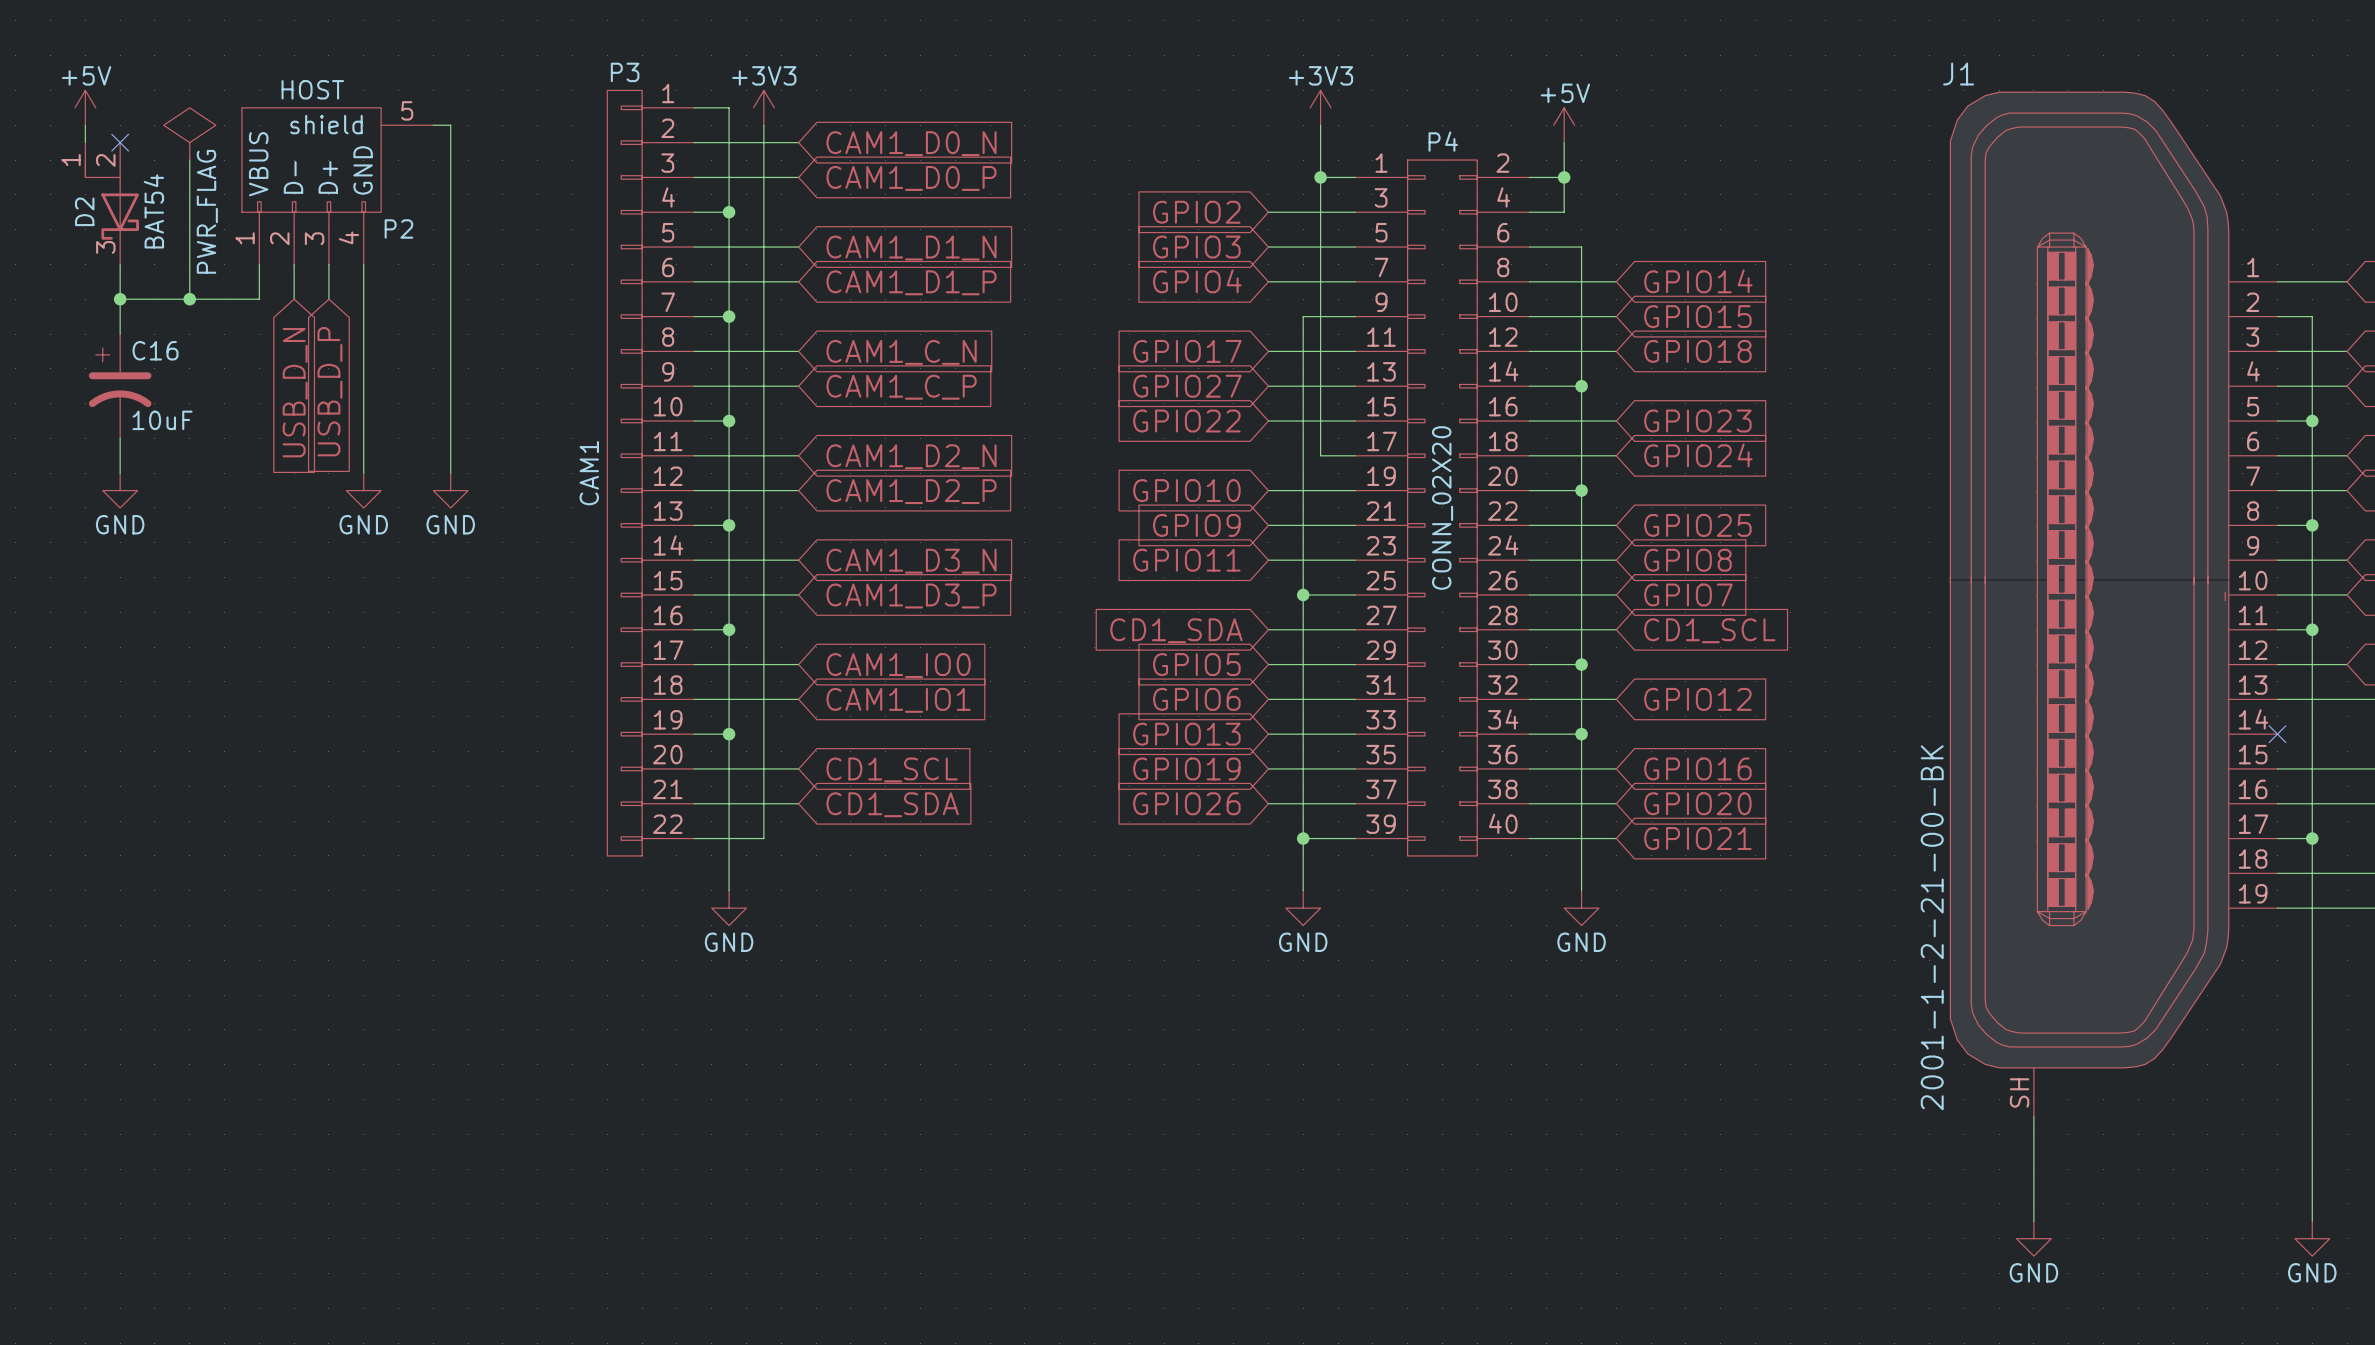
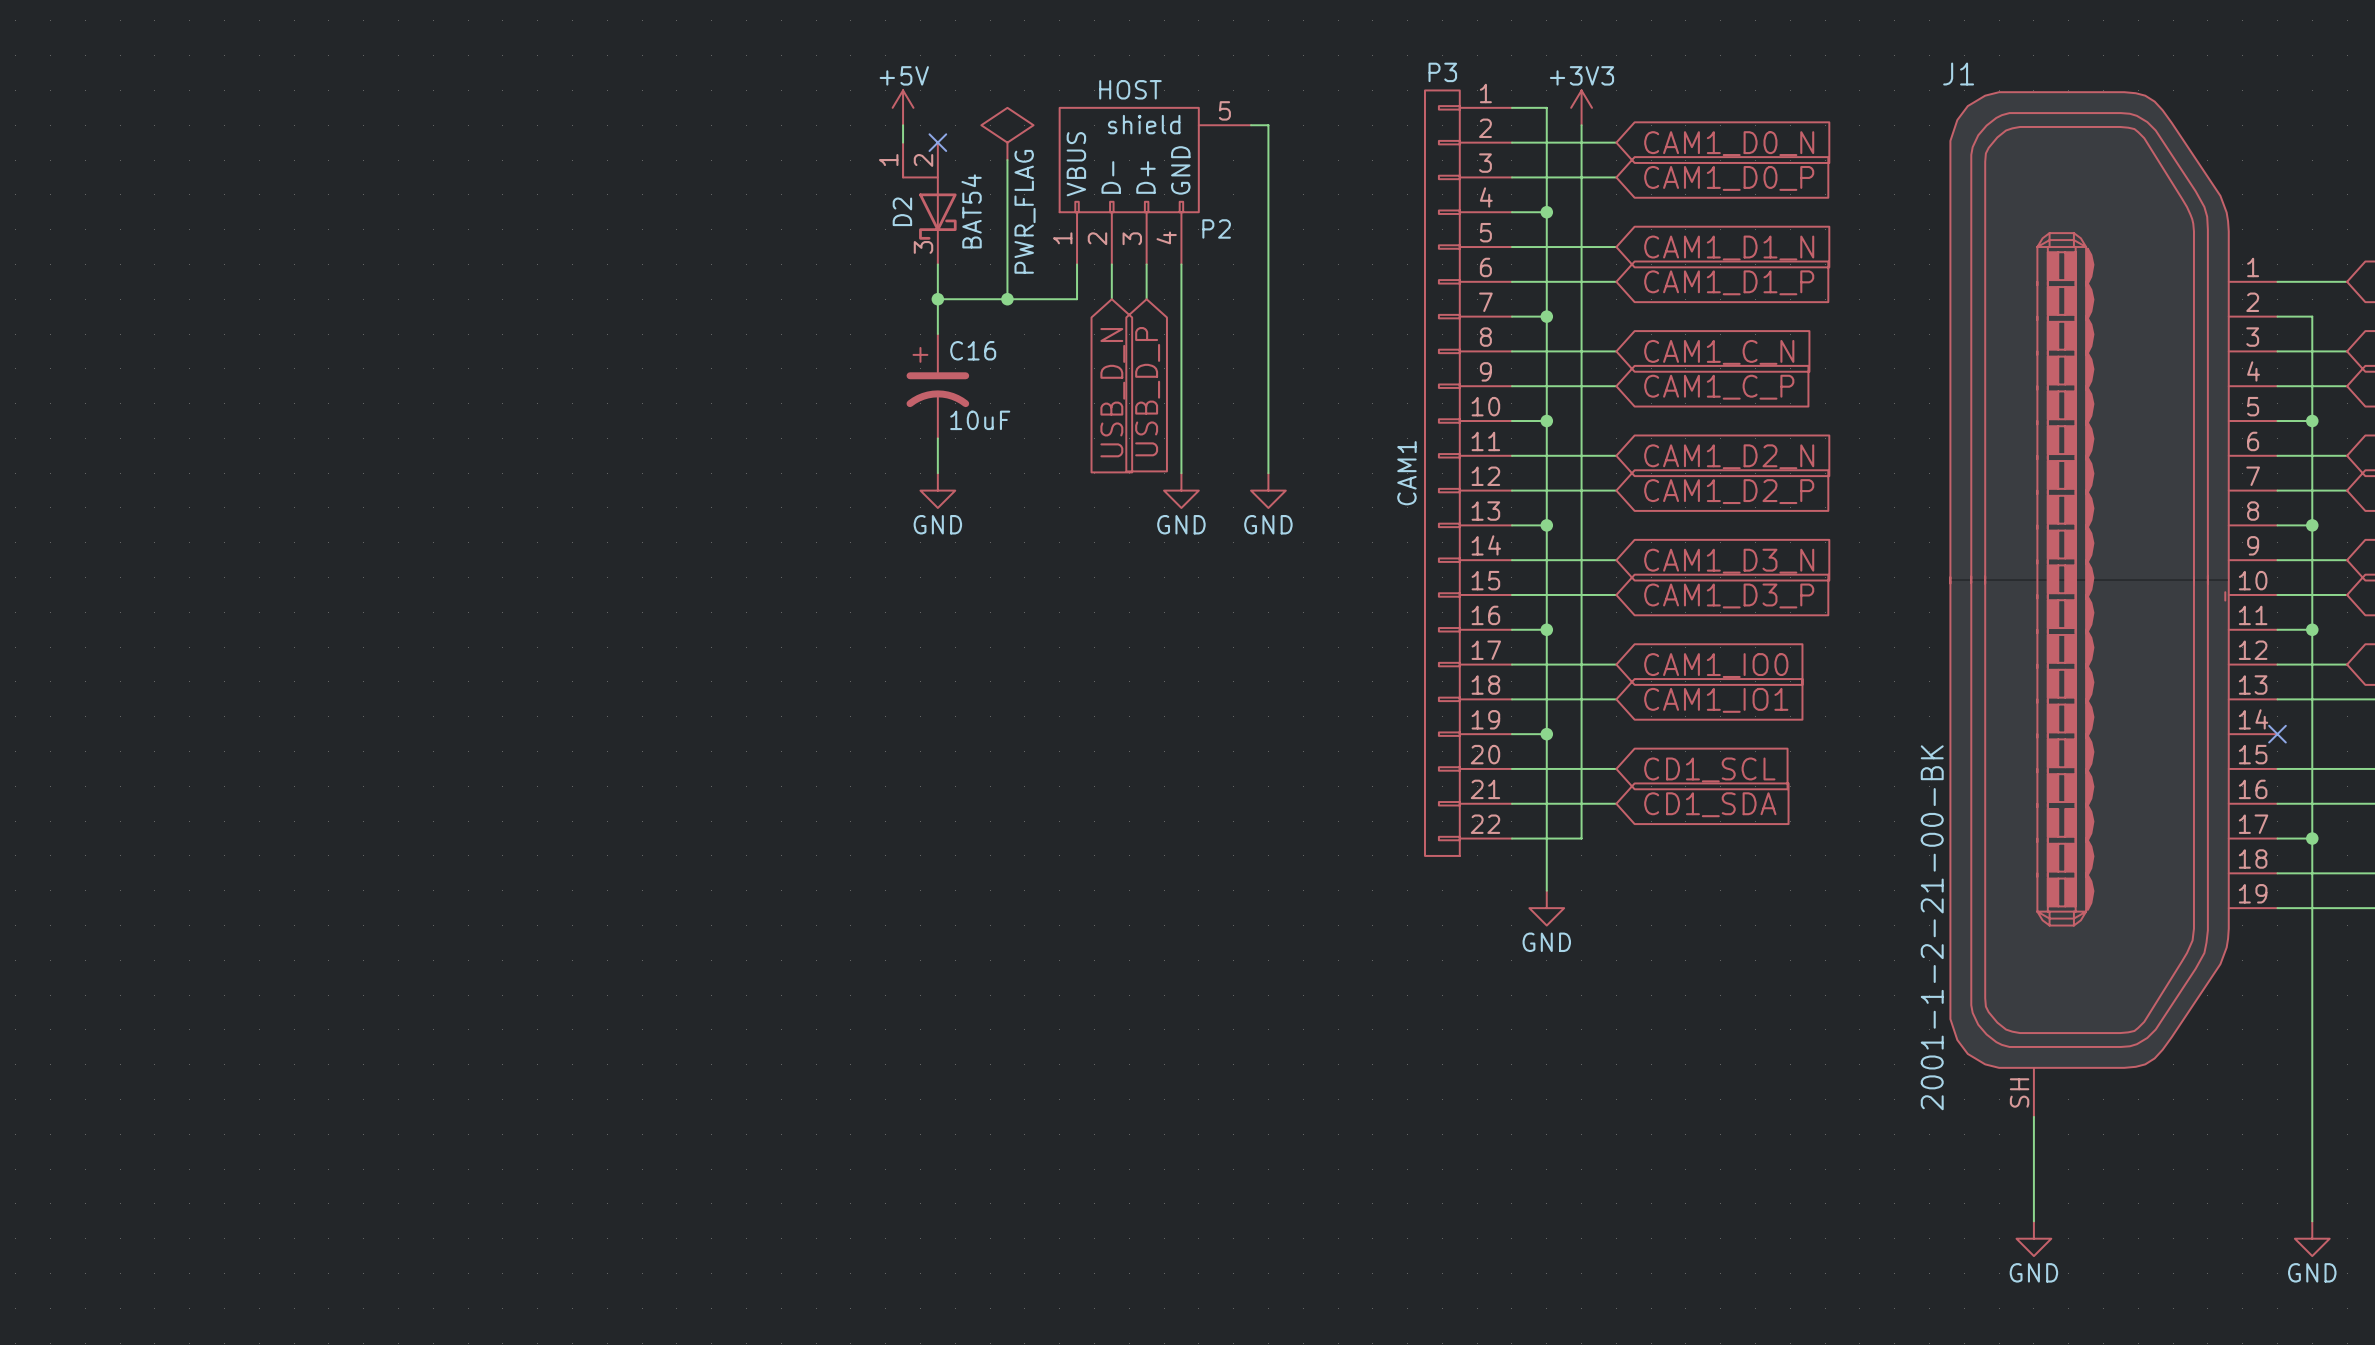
power symbol: +5V (85, 107) -> none
wire: (694, 107) (729, 107) (729, 890) -> none
power symbol: +3V3 (763, 107) -> none
power symbol: none -> +5V (903, 107)
power symbol position: +3V3 (1320, 107) -> +3V3 (1581, 107)
wire: none -> (1511, 107) (1546, 107) (1546, 890)
wire: (85, 125) (85, 142) -> none
wire: (433, 125) (450, 125) (450, 473) -> none
wire: (763, 125) (763, 838) (694, 838) -> none
wire: none -> (903, 125) (903, 142)
wire: none -> (1251, 125) (1268, 125) (1268, 473)
wire: (1320, 125) (1320, 455) (1355, 455) -> none
power symbol: +5V (1564, 125) -> none
wire: none -> (1581, 125) (1581, 247) (1616, 247)
power symbol: PWR_FLAG (189, 133) -> none
power symbol: none -> PWR_FLAG (1007, 133)
no-connect mark: (120, 142) -> none
wire: (694, 142) (798, 142) -> none
no-connect mark: none -> (937, 142)
wire: none -> (1511, 142) (1616, 142)
wire: (1564, 142) (1564, 212) (1546, 212) -> none
global label: CAM1_D0_N (911, 143) -> none
global label: none -> CAM1_D0_N (1729, 143)
wire: (189, 160) (189, 299) -> none
wire: none -> (1007, 160) (1007, 299)
wire: (694, 177) (798, 177) -> none
wire: (1320, 177) (1355, 177) -> (1581, 386) (1616, 386)
junction: (1320, 177) -> none
wire: none -> (1564, 177) (1616, 177)
junction position: (1564, 177) -> (1546, 212)
global label: CAM1_D0_P (911, 178) -> none
global label: none -> CAM1_D0_P (1729, 178)
P2 position: (337, 186) -> (1155, 186)
D2 position: (112, 203) -> (929, 203)
wire: (694, 212) (729, 212) -> none
junction: (729, 212) -> none
global label: GPIO2 (1196, 212) -> none
wire: (1268, 212) (1355, 212) -> none
wire: (694, 247) (798, 247) -> none
global label: GPIO3 (1196, 247) -> none
wire: (1268, 247) (1355, 247) -> none
global label: CAM1_D1_N (911, 248) -> none
global label: none -> CAM1_D1_N (1729, 248)
wire: (120, 264) (120, 334) -> none
wire: (259, 264) (259, 299) (120, 299) -> none
wire: (294, 264) (294, 299) -> none
wire: (328, 264) (328, 299) -> none
wire: (363, 264) (363, 473) -> none
wire: none -> (937, 264) (937, 334)
wire: none -> (1077, 264) (1077, 299) (937, 299)
wire: none -> (1111, 264) (1111, 299)
wire: none -> (1146, 264) (1146, 299)
wire: none -> (1181, 264) (1181, 473)
wire: (694, 281) (798, 281) -> none
global label: GPIO4 (1197, 281) -> none
wire: (1268, 281) (1355, 281) -> none
global label: GPIO14 (1698, 281) -> CAM1_D1_P (1729, 282)
global label: CAM1_D1_P (911, 282) -> none
junction: (120, 299) -> none
junction: (189, 299) -> none
junction: none -> (937, 299)
junction: none -> (1007, 299)
wire: (694, 316) (729, 316) -> none
junction: (729, 316) -> none
wire: (1355, 316) (1303, 316) (1303, 890) -> none
wire: (1546, 316) (1616, 316) -> none
junction: none -> (1546, 316)
global label: GPIO15 (1697, 316) -> none
wire: (694, 351) (798, 351) -> none
global label: GPIO17 (1187, 351) -> none
wire: (1268, 351) (1355, 351) -> none
global label: GPIO18 (1697, 351) -> CAM1_C_N (1719, 352)
global label: CAM1_C_N (901, 352) -> none
C16 position: (120, 386) -> (937, 386)
wire: (694, 386) (798, 386) -> none
global label: GPIO27 (1187, 386) -> none
wire: (1268, 386) (1355, 386) -> none
junction: (1581, 386) -> none
global label: CAM1_C_P (901, 387) -> none
global label: none -> CAM1_C_P (1719, 387)
global label: USB_D_P (329, 391) -> none
global label: none -> USB_D_P (1147, 391)
global label: USB_D_N (295, 392) -> none
global label: none -> USB_D_N (1112, 392)
wire: (694, 421) (729, 421) -> none
junction: (729, 421) -> none
global label: GPIO22 (1186, 421) -> none
wire: (1268, 421) (1355, 421) -> none
wire: (1546, 421) (1616, 421) -> none
junction: none -> (1546, 421)
global label: GPIO23 (1697, 421) -> none
wire: (120, 438) (120, 473) -> none
wire: none -> (937, 438) (937, 473)
wire: (694, 455) (798, 455) -> none
global label: GPIO24 (1698, 455) -> CAM1_D2_N (1729, 456)
global label: CAM1_D2_N (911, 456) -> none
P3 position: (650, 473) -> (1468, 473)
power symbol: GND (120, 490) -> none
power symbol: GND (363, 490) -> none
power symbol: GND (450, 490) -> none
wire: (694, 490) (798, 490) -> none
power symbol: none -> GND (937, 490)
power symbol: none -> GND (1181, 490)
global label: GPIO10 (1186, 490) -> none
wire: (1268, 490) (1355, 490) -> none
power symbol: none -> GND (1268, 490)
wire: none -> (1581, 490) (1616, 490)
junction: (1581, 490) -> none
global label: CAM1_D2_P (911, 491) -> none
global label: none -> CAM1_D2_P (1729, 491)
P4: CONN_02X20 (1442, 507) -> none
wire: (694, 525) (729, 525) -> none
junction: (729, 525) -> none
global label: GPIO9 (1196, 525) -> none
wire: (1268, 525) (1355, 525) -> none
wire: (1546, 525) (1616, 525) -> none
junction: none -> (1546, 525)
global label: GPIO25 (1697, 525) -> none
wire: (694, 560) (798, 560) -> none
global label: GPIO11 (1186, 560) -> none
wire: (1268, 560) (1355, 560) -> none
global label: GPIO8 (1687, 560) -> CAM1_D3_N (1729, 561)
global label: CAM1_D3_N (911, 561) -> none
wire: (694, 594) (798, 594) -> none
wire: (1303, 594) (1355, 594) -> none
junction: (1303, 594) -> none
global label: GPIO7 (1688, 594) -> CAM1_D3_P (1729, 595)
global label: CAM1_D3_P (911, 595) -> none
wire: (694, 629) (729, 629) -> none
junction: (729, 629) -> none
wire: (1268, 629) (1355, 629) -> none
wire: (1546, 629) (1616, 629) -> none
junction: none -> (1546, 629)
global label: CD1_SDA (1176, 630) -> none
global label: CD1_SCL (1709, 630) -> none
wire: (694, 664) (798, 664) -> none
global label: GPIO5 (1196, 664) -> none
wire: (1268, 664) (1355, 664) -> none
junction: (1581, 664) -> none
global label: CAM1_IO0 (898, 665) -> none
global label: none -> CAM1_IO0 (1716, 665)
wire: (694, 699) (798, 699) -> none
global label: GPIO6 (1196, 699) -> none
wire: (1268, 699) (1355, 699) -> none
global label: GPIO12 (1697, 699) -> CAM1_IO1 (1716, 700)
global label: CAM1_IO1 (898, 700) -> none
wire: (694, 734) (729, 734) -> none
junction: (729, 734) -> none
global label: GPIO13 (1186, 734) -> none
wire: (1268, 734) (1355, 734) -> none
wire: (1546, 734) (1581, 734) -> (1581, 664) (1616, 664)
junction position: (1581, 734) -> (1546, 734)
wire: (694, 768) (798, 768) -> none
global label: GPIO19 (1186, 768) -> none
wire: (1268, 768) (1355, 768) -> none
global label: GPIO16 (1697, 768) -> CD1_SCL (1709, 769)
global label: CD1_SCL (892, 769) -> none
wire: (694, 803) (798, 803) -> none
global label: GPIO26 (1186, 803) -> none
wire: (1268, 803) (1355, 803) -> none
global label: GPIO20 (1697, 803) -> CD1_SDA (1710, 804)
global label: CD1_SDA (892, 804) -> none
wire: (1303, 838) (1355, 838) -> none
junction: (1303, 838) -> none
wire: (1616, 838) (1581, 838) (1581, 890) -> none
global label: GPIO21 (1697, 838) -> none
power symbol: GND (729, 908) -> none
power symbol: GND (1303, 908) -> none
power symbol position: GND (1581, 908) -> GND (1546, 908)

